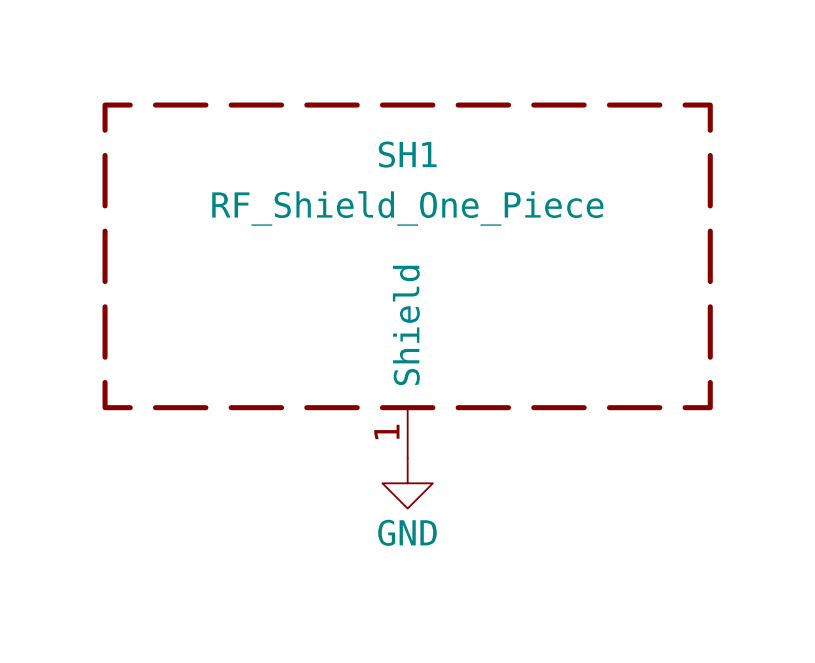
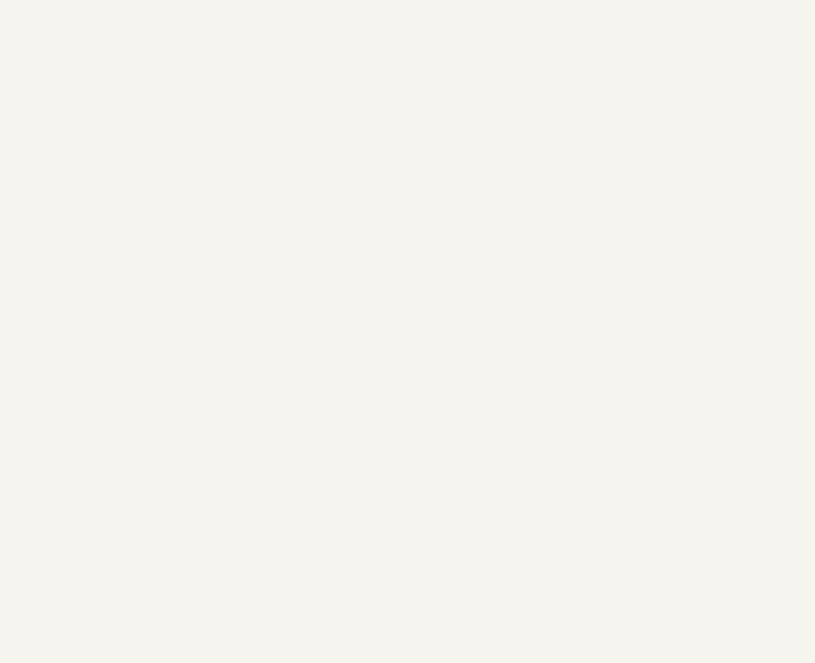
SH1: RF_Shield_One_Piece (407, 280) -> none
power symbol: GND (407, 483) -> none

